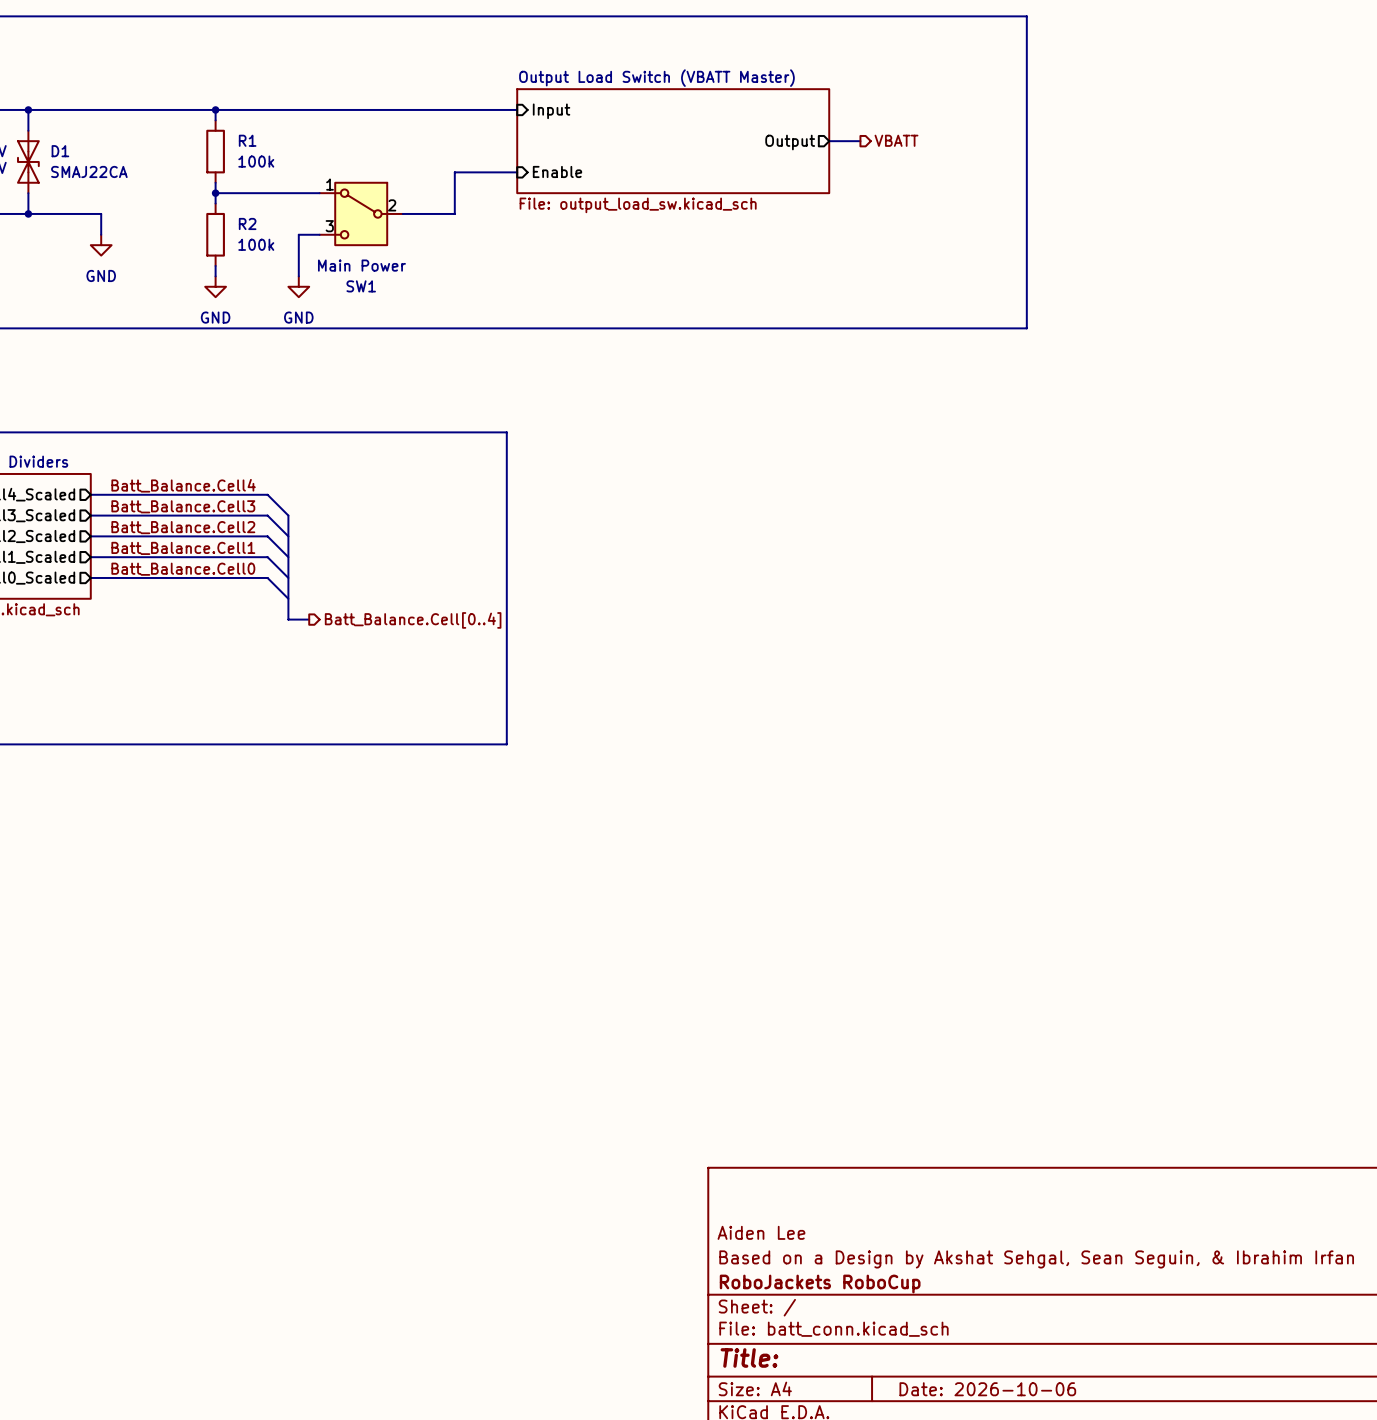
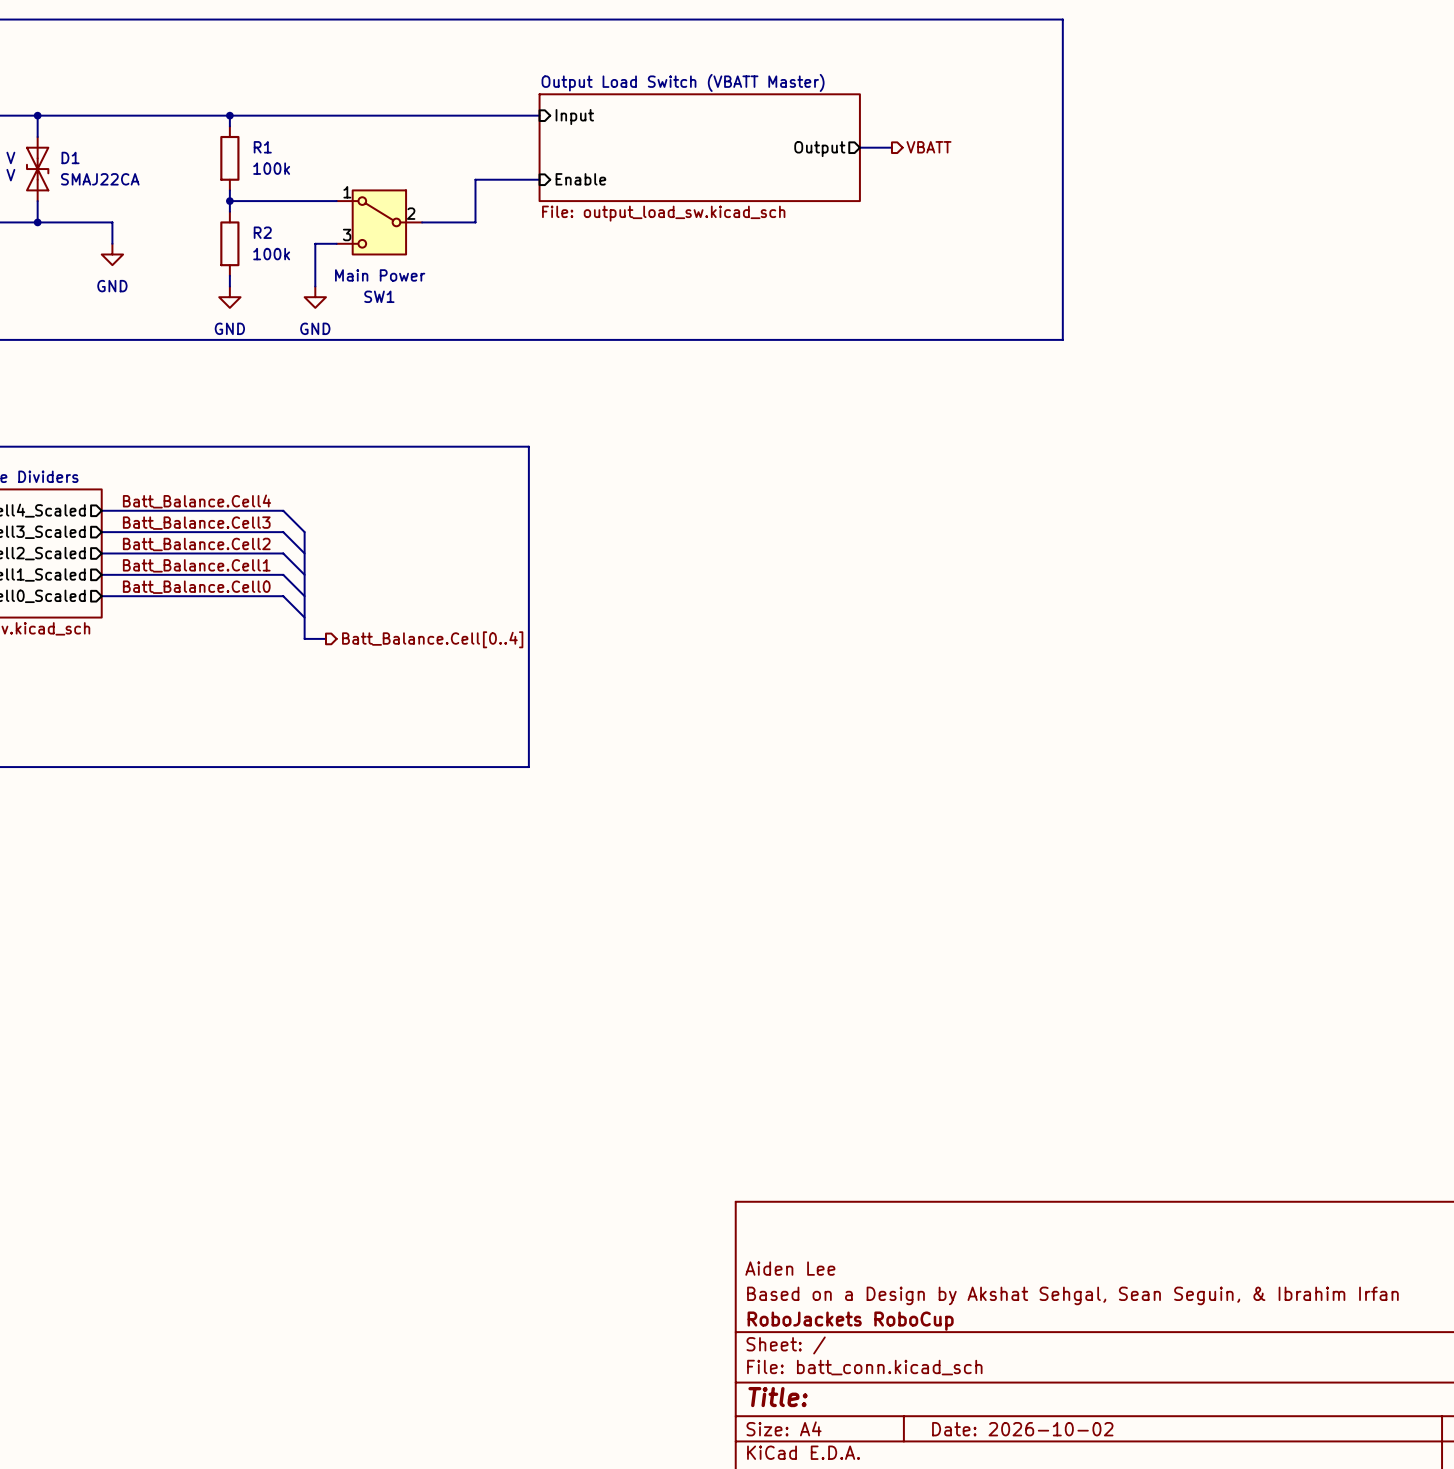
title block: Date: 2026-10-06 (987, 1389) -> Date: 2026-10-02 (1022, 1429)

